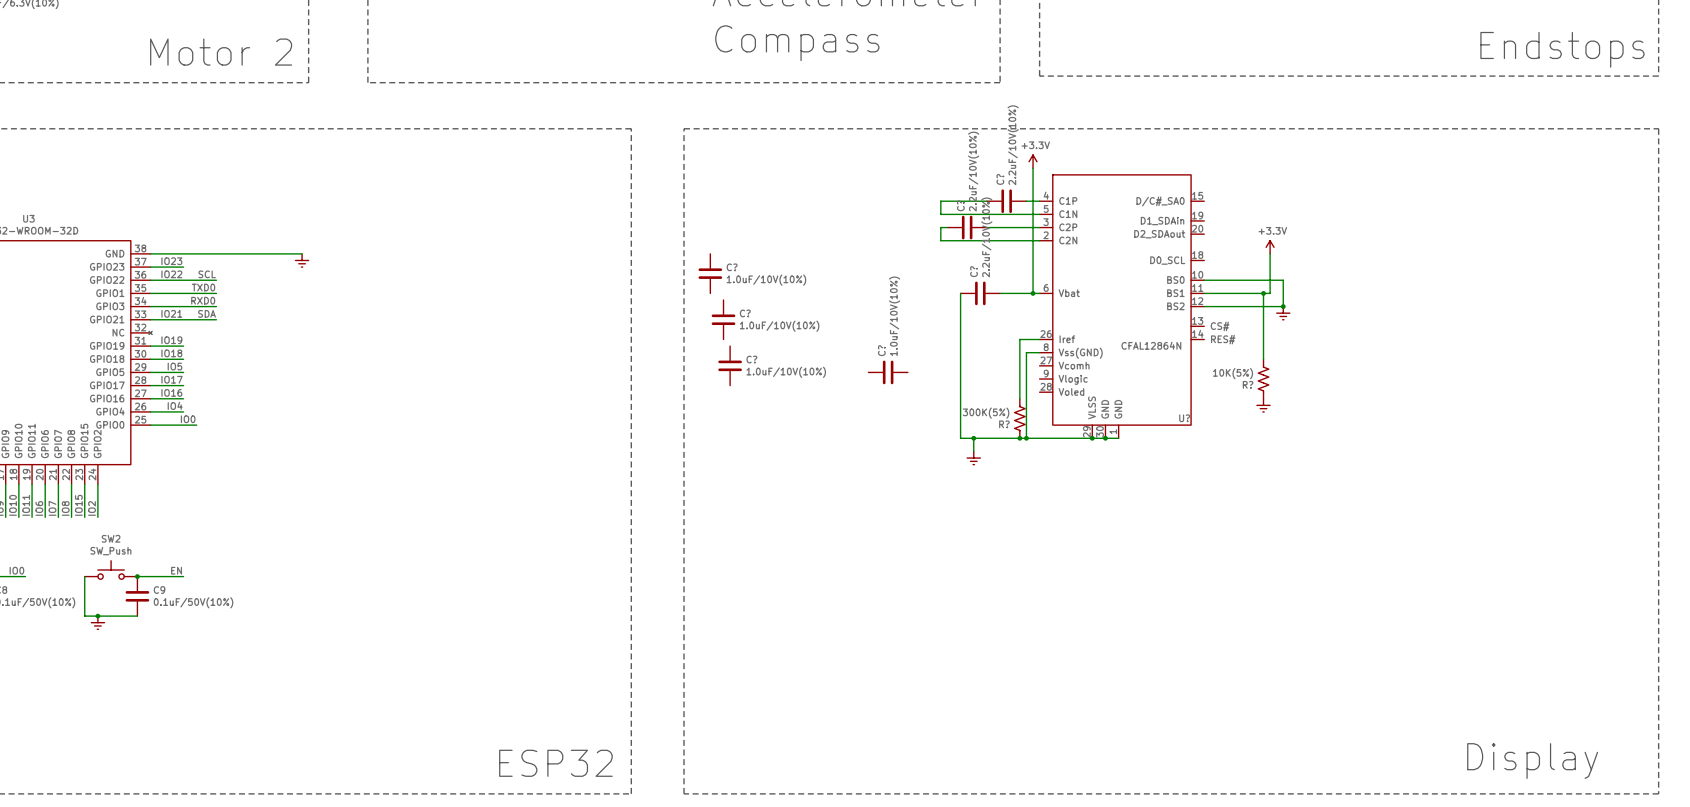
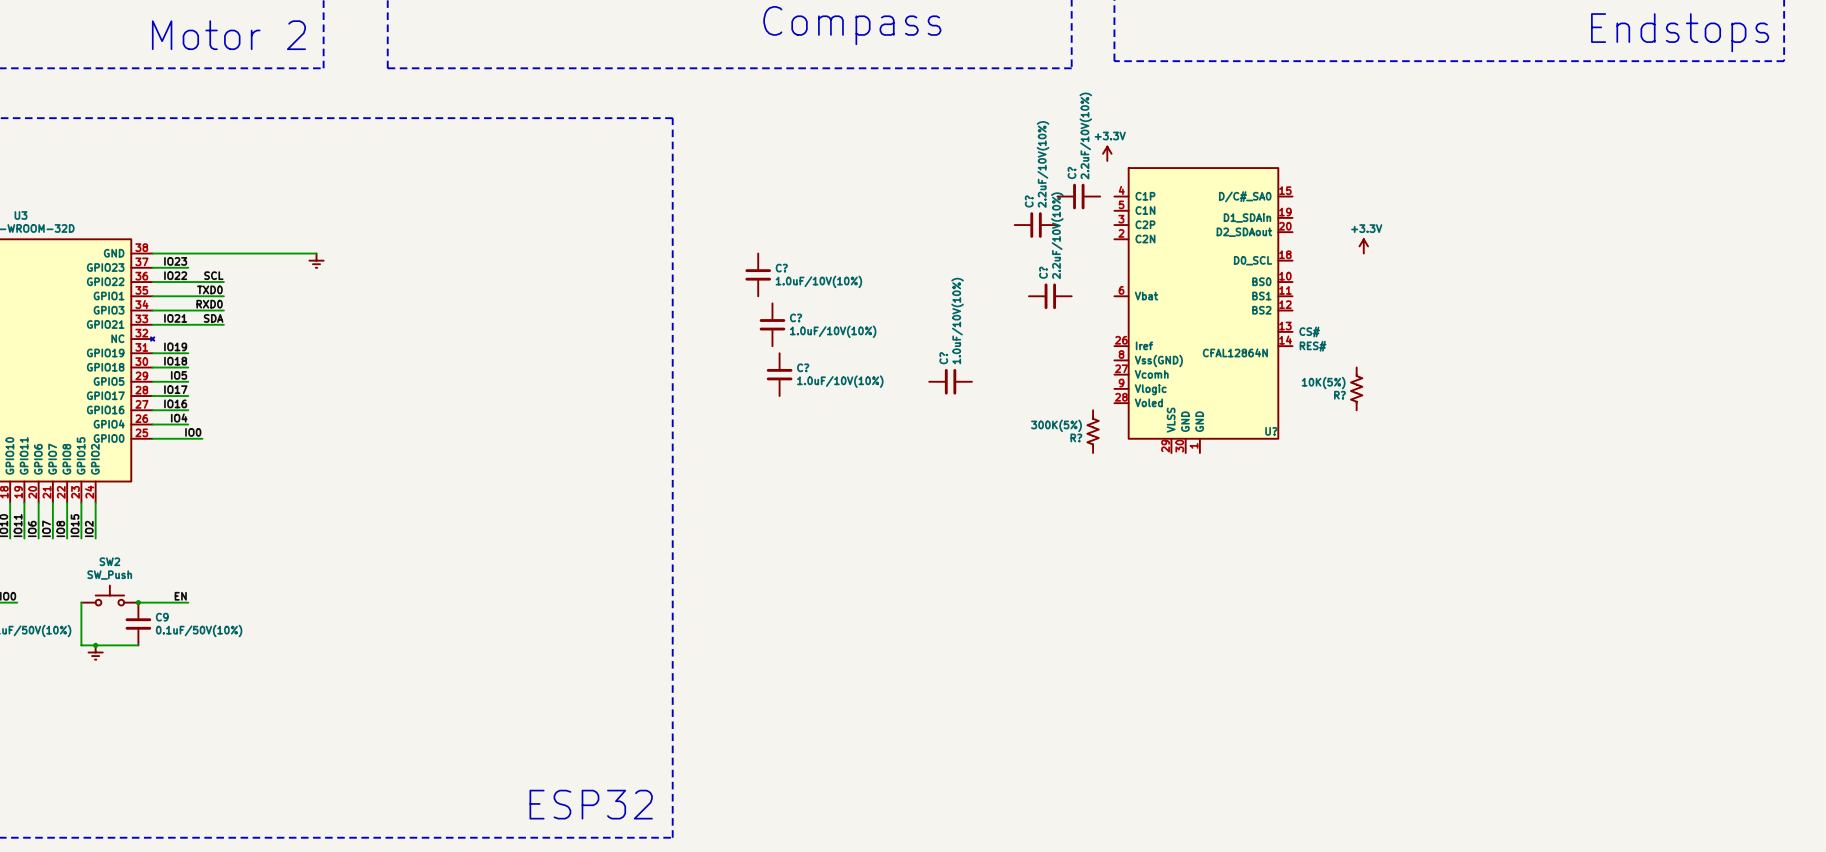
line: (684, 128) (1658, 128) (1658, 793) (684, 793) (684, 128) -> none
wire: (1033, 168) (1033, 293) -> none
wire: (986, 201) (940, 201) (940, 214) (1039, 214) -> none
wire: (1026, 201) (1039, 201) -> none
wire: (947, 227) (940, 227) (940, 240) (1039, 240) -> none
wire: (986, 227) (1039, 227) -> none
wire: (1270, 253) (1270, 293) (1204, 293) -> none
wire: (1204, 280) (1283, 280) (1283, 306) (1204, 306) -> none
wire: (960, 293) (960, 438) (1118, 438) -> none
wire: (1000, 293) (1039, 293) -> none
junction: (1033, 293) -> none
wire: (1263, 293) (1263, 359) -> none
junction: (1263, 293) -> none
junction: (1283, 306) -> none
power symbol: (1283, 313) -> none
wire: (1039, 339) (1019, 339) (1019, 398) -> none
wire: (1039, 352) (1026, 352) (1026, 438) -> none
power symbol: (1263, 405) -> none
wire: (973, 438) (973, 451) -> none
junction: (973, 438) -> none
junction: (1019, 438) -> none
junction: (1026, 438) -> none
junction: (1092, 438) -> none
junction: (1105, 438) -> none
power symbol: (973, 458) -> none
text: Display (1532, 761) -> none

